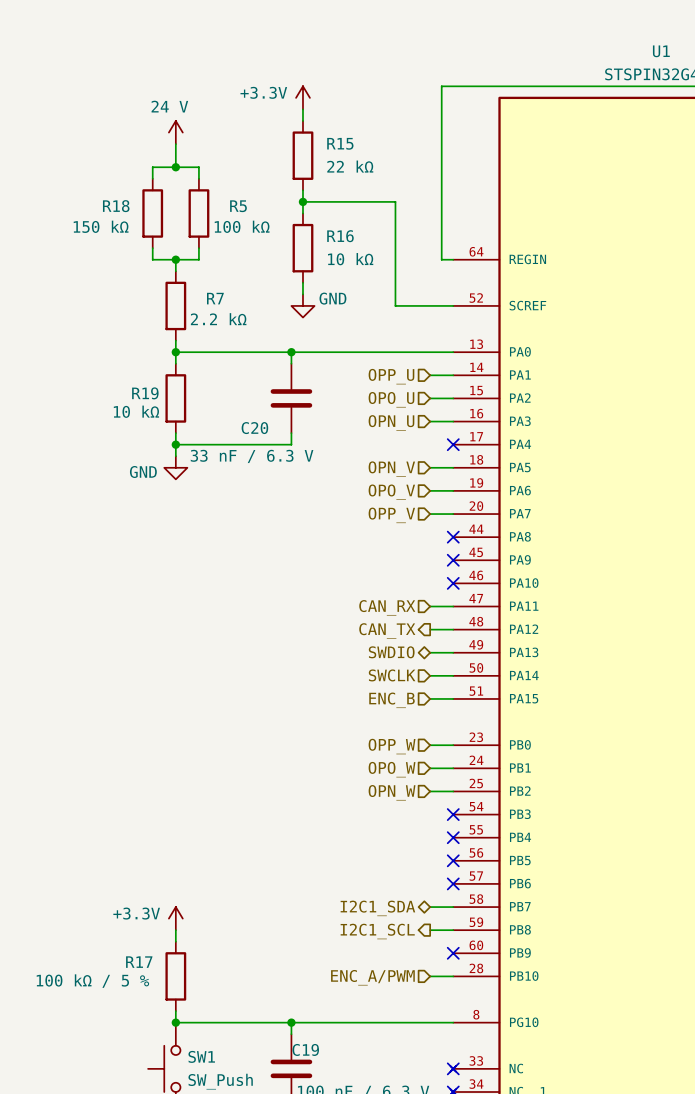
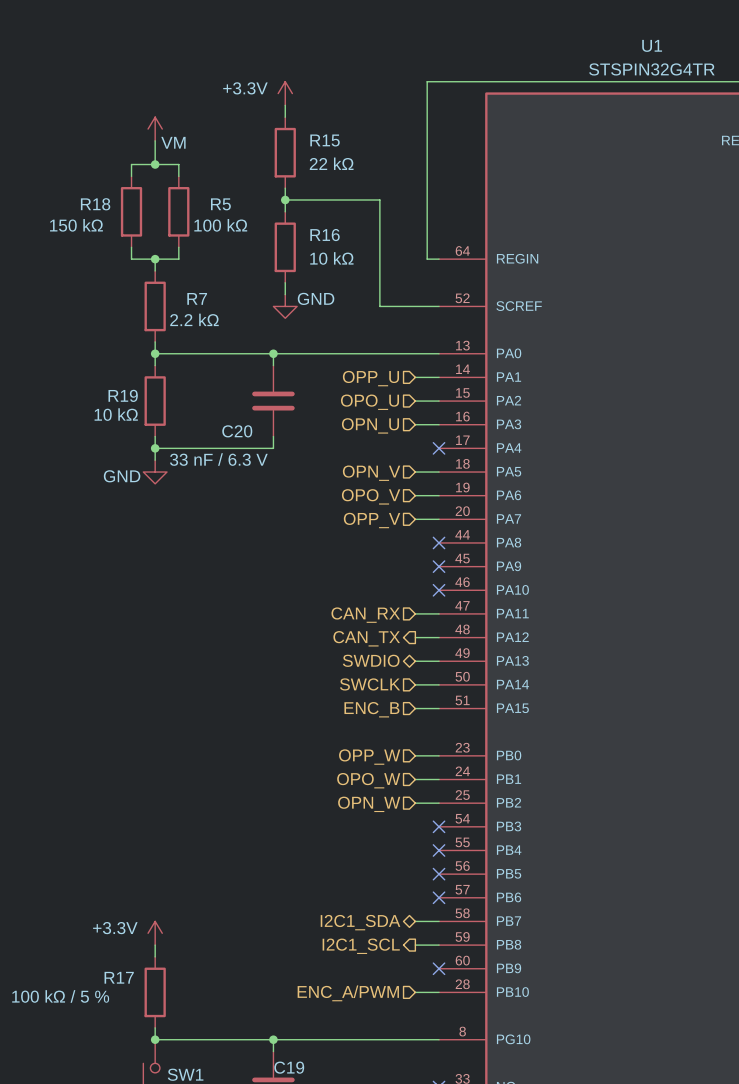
power symbol: 24 V (175, 132) -> VM (155, 129)

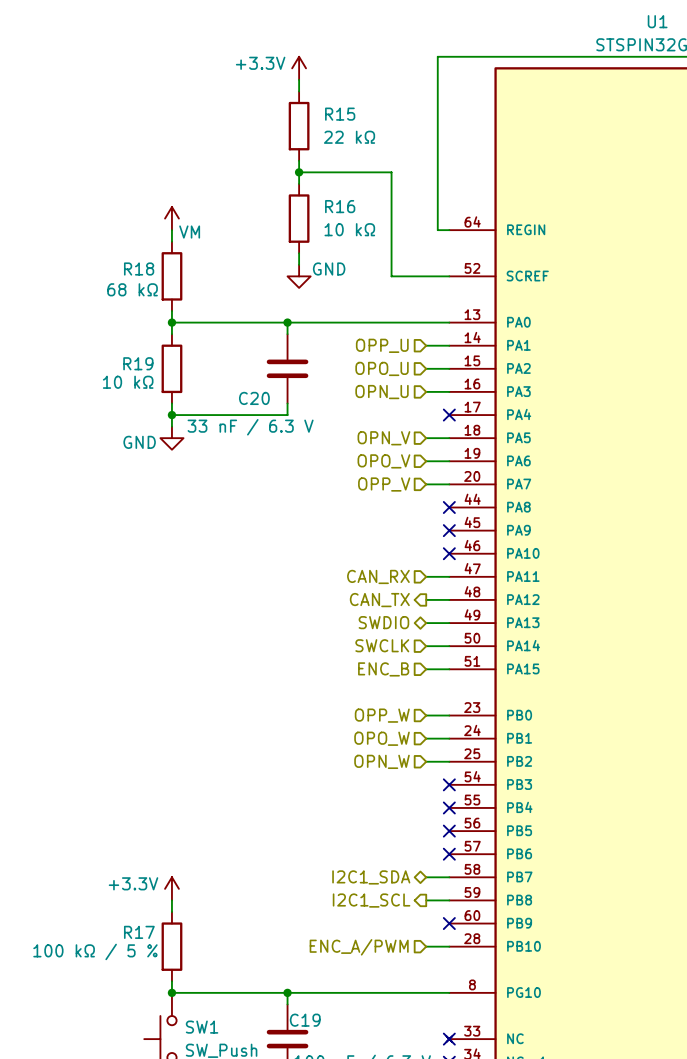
power symbol position: VM (155, 129) -> VM (171, 218)
wire: (155, 140) (155, 164) -> none
junction: (155, 164) -> none
wire: (131, 176) (131, 164) (178, 164) (178, 176) -> none
R18: 150 kΩ (131, 211) -> none
R5: 100 kΩ (178, 211) -> none
wire: (131, 247) (131, 259) (178, 259) (178, 247) -> none
junction: (155, 259) -> none
R7 name: R7 (197, 298) -> R18 (139, 269)
R7 value: 2.2 kΩ (194, 319) -> 68 kΩ (132, 289)

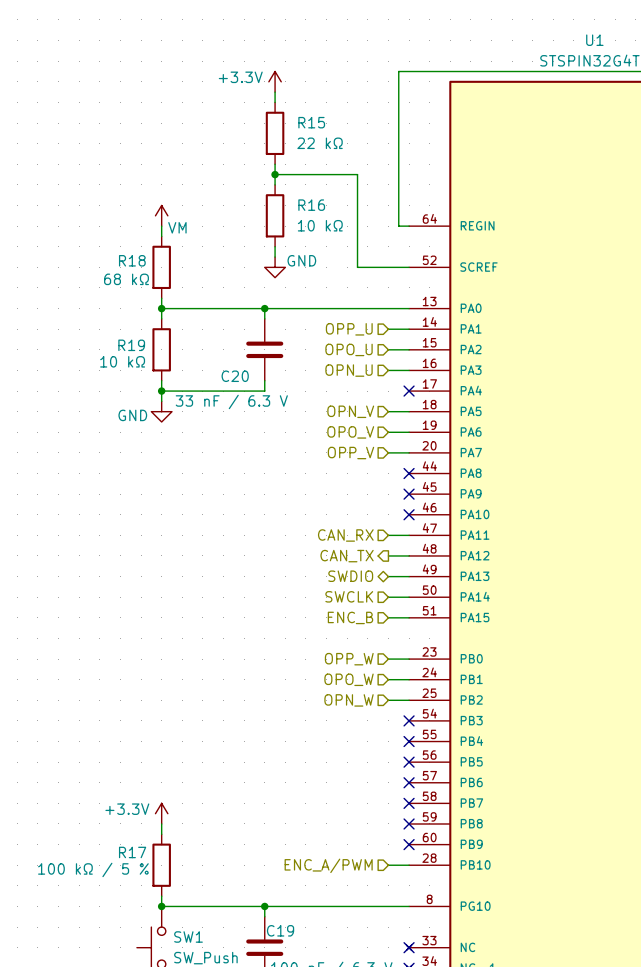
hierarchical label: I2C1_SDA (371, 877) -> none
wire: (426, 877) (449, 877) -> none
no-connect mark: none -> (409, 803)
hierarchical label: I2C1_SCL (371, 900) -> none
wire: (426, 900) (449, 900) -> none
no-connect mark: none -> (409, 823)

